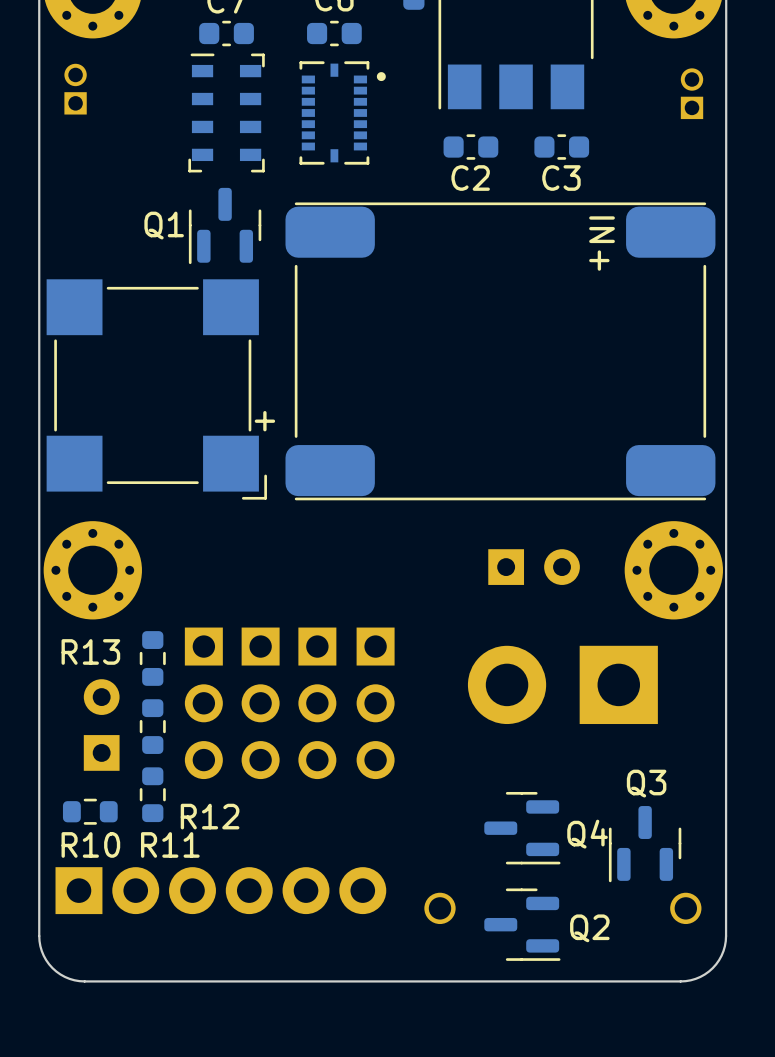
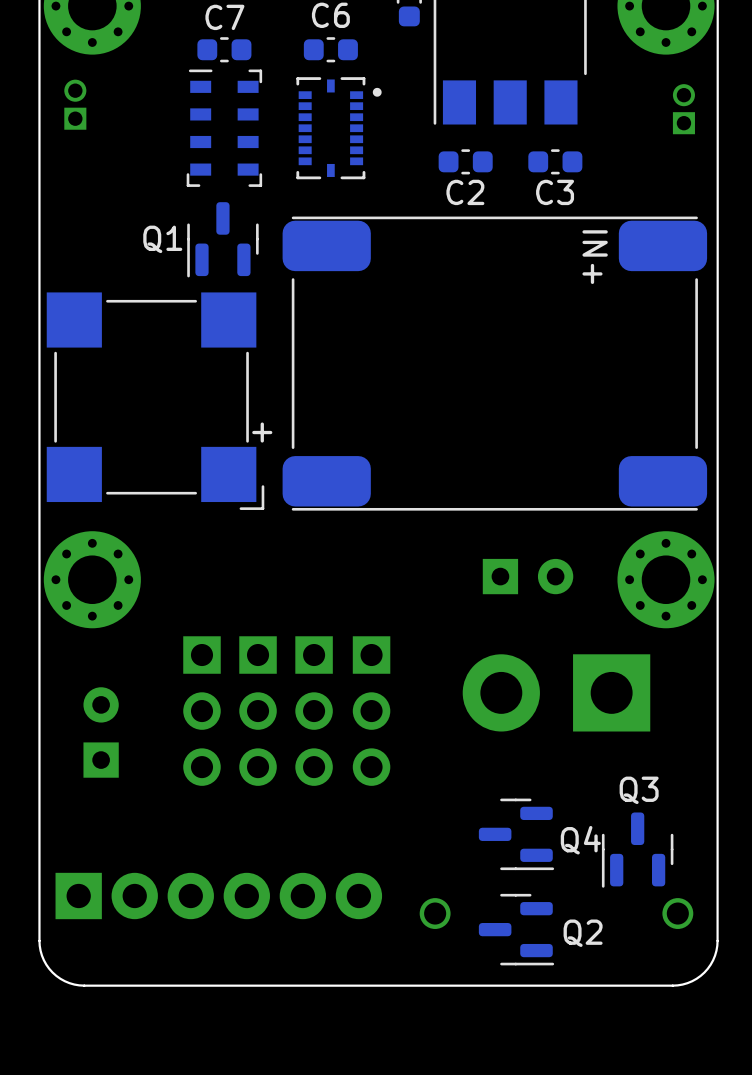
R13: (152, 658) -> none
R12: (152, 726) -> none
R11: (152, 794) -> none
R10: (90, 811) -> none

